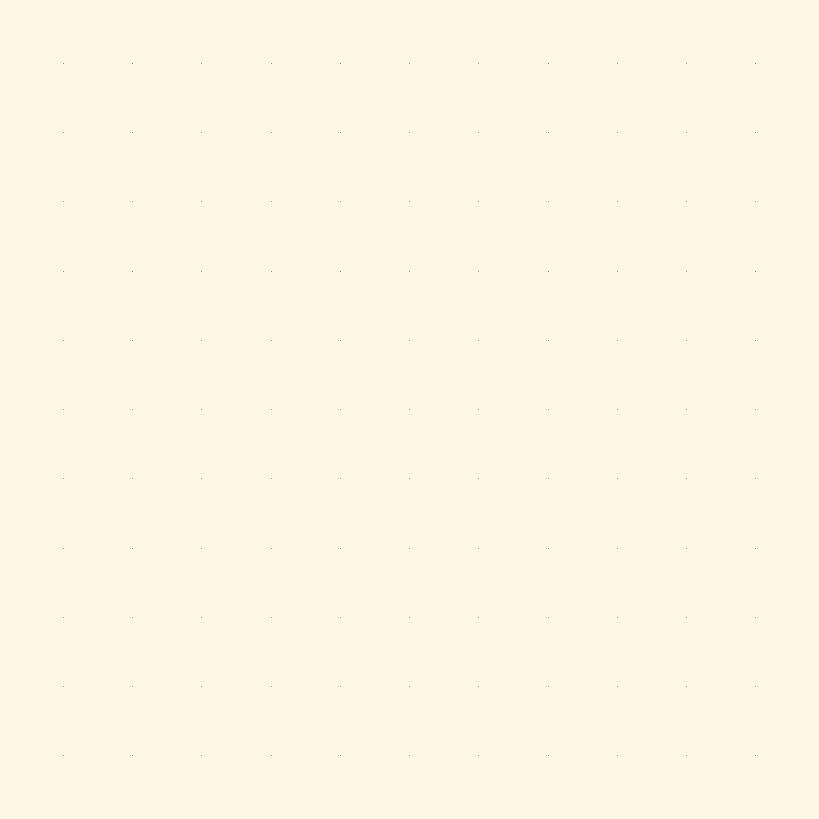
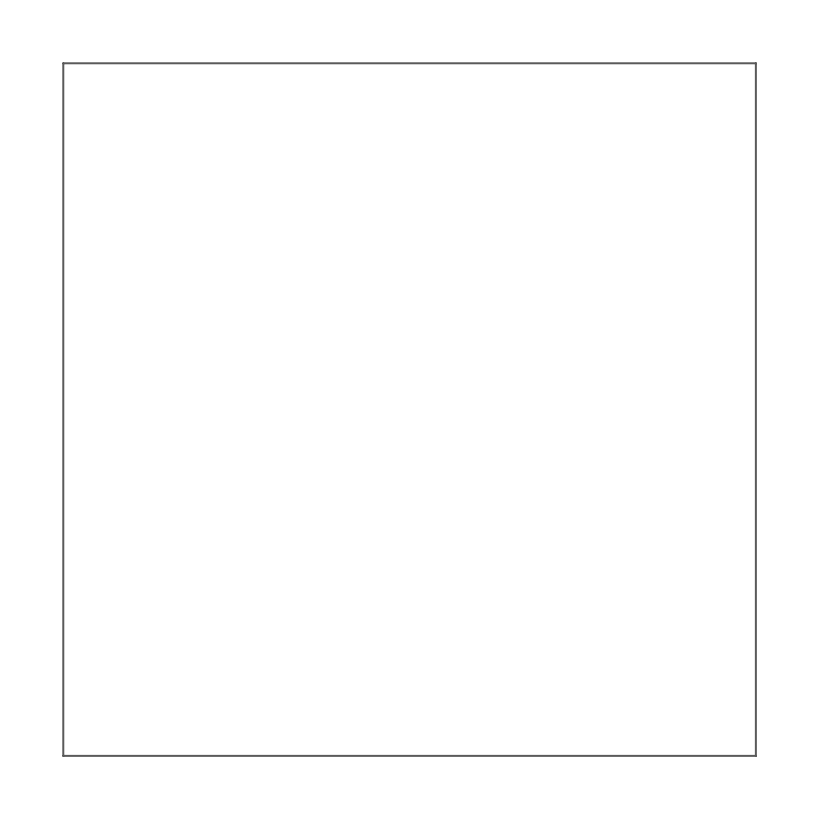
line: none -> (63, 63) (755, 63) (755, 755) (63, 755) (63, 63)

